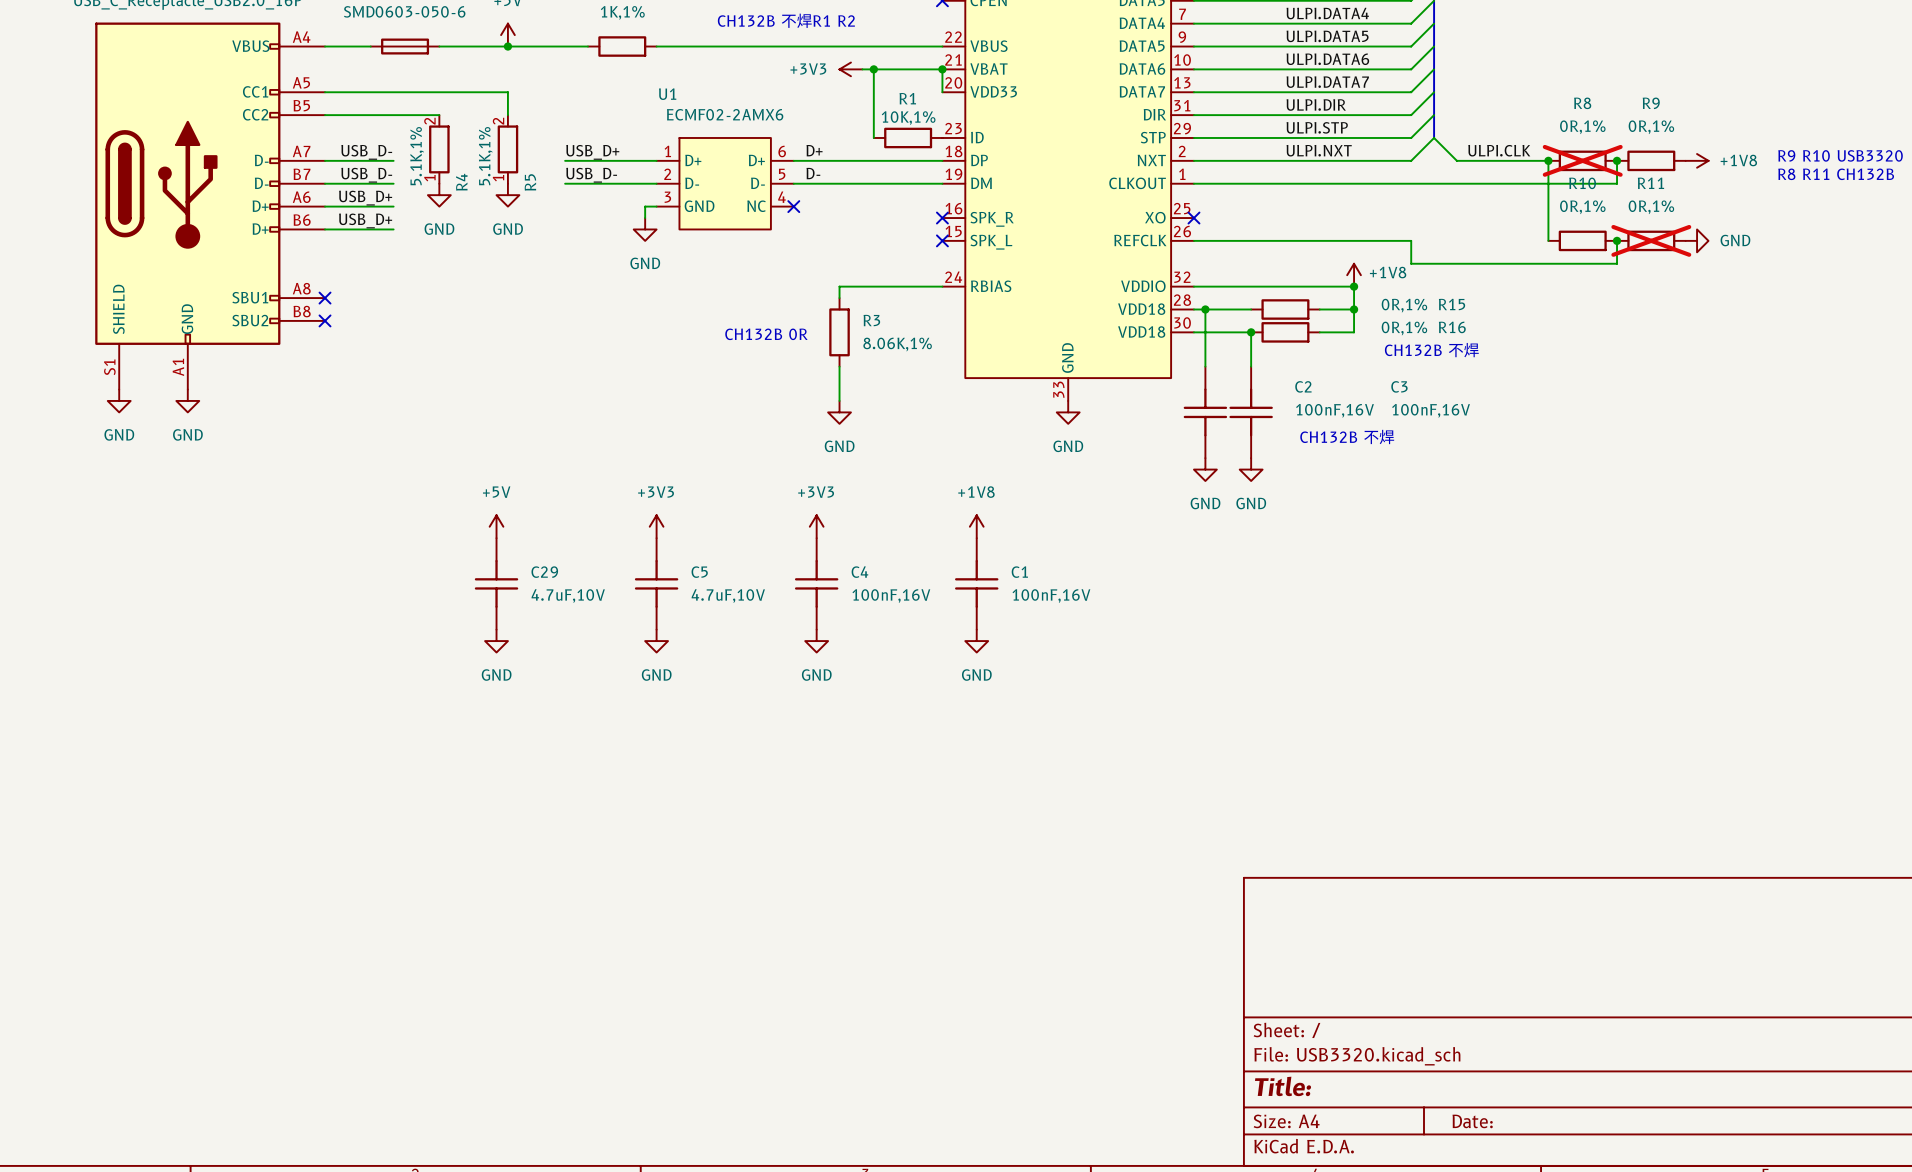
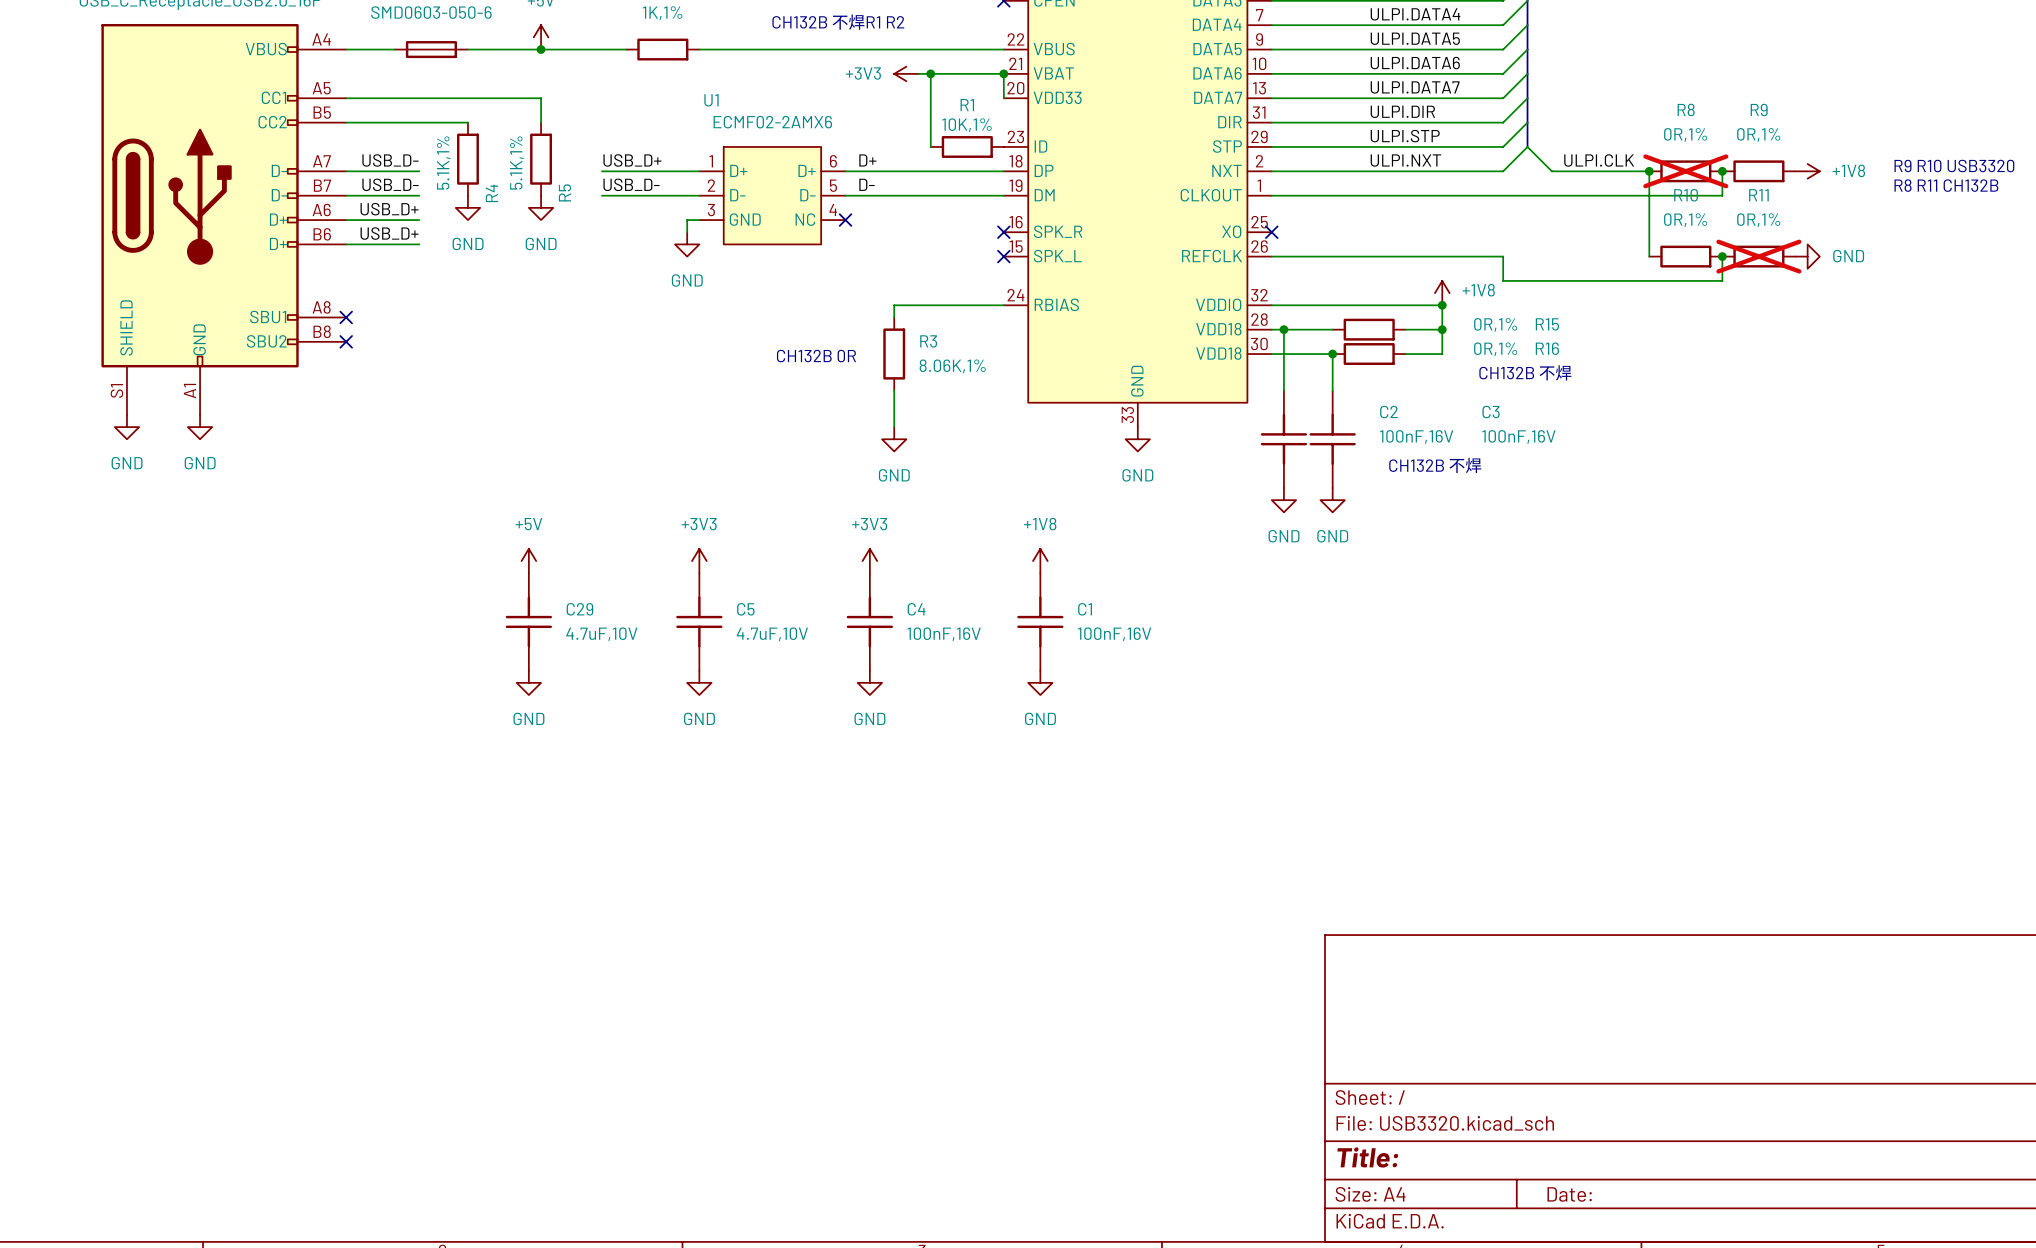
R4 pin number: 2 (429, 121) -> none
R5 pin number: 2 (498, 121) -> none
R4 pin number: 1 (429, 178) -> none
R5 pin number: 1 (498, 178) -> none

